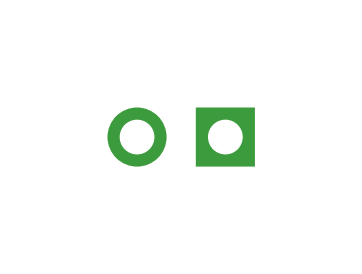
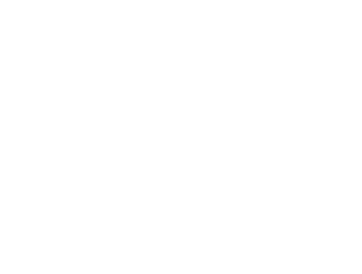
part: (181, 137) -> none

